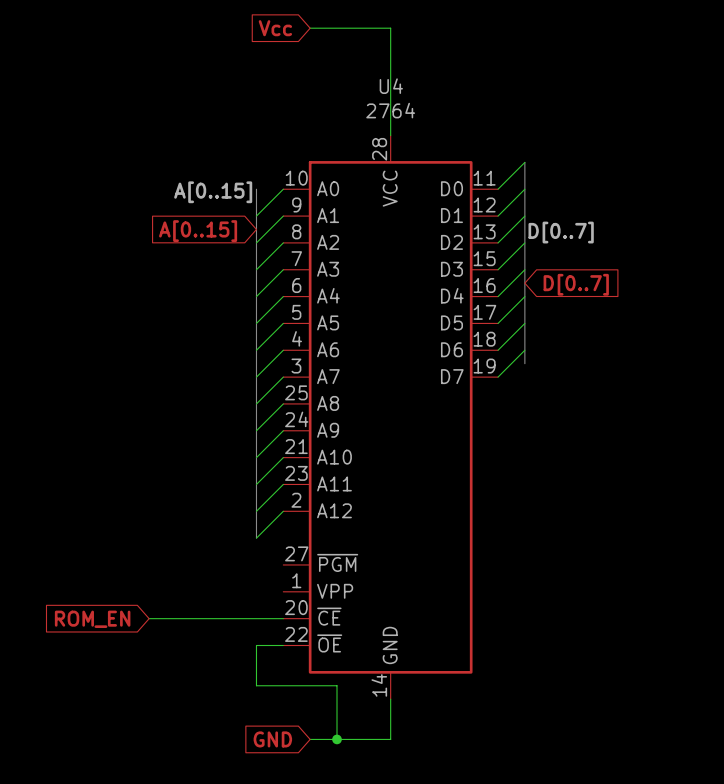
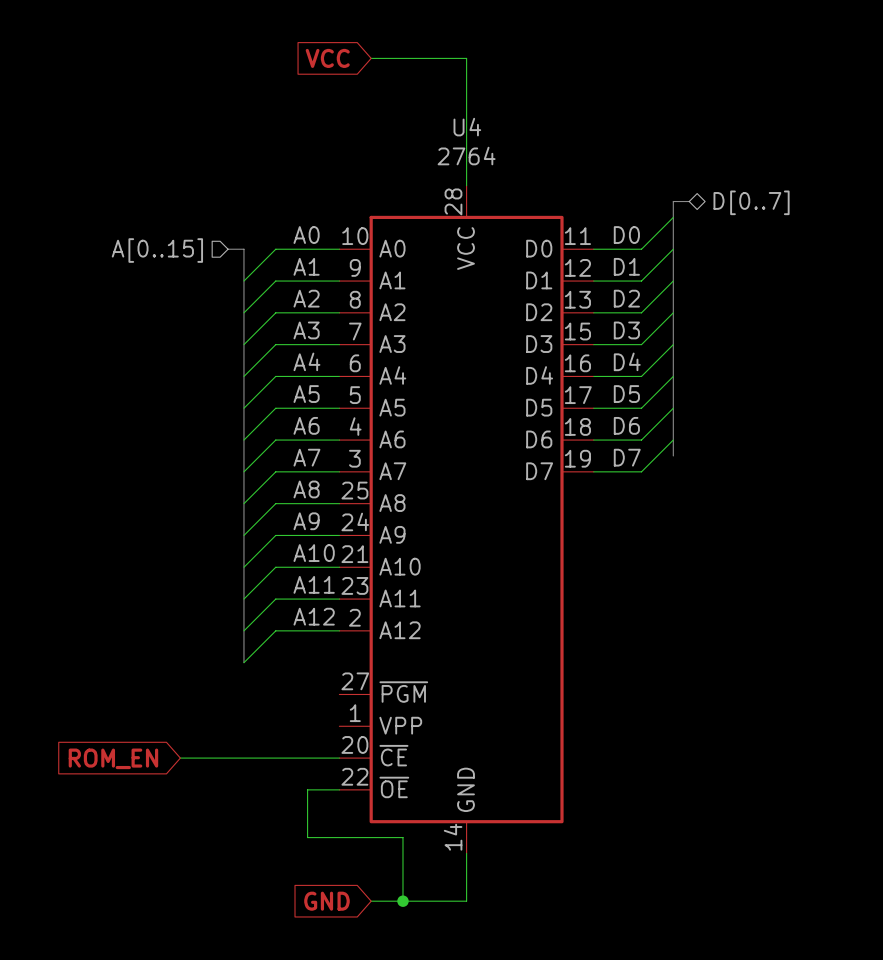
global label: Vcc (275, 28) -> VCC (327, 58)
bus: none -> (689, 201) (673, 201) (673, 455)
hierarchical label: none -> D[0..7] (751, 202)
wire: (524, 162) (498, 189) -> (673, 217) (641, 249) (593, 249)
bus: (524, 162) (524, 363) -> none
label: none -> A0 (306, 235)
label: none -> D0 (626, 235)
bus: none -> (228, 249) (243, 249) (243, 662)
bus: (256, 189) (256, 538) -> none
wire: (283, 189) (256, 216) -> (339, 249) (275, 249) (243, 281)
wire: (524, 189) (498, 216) -> (673, 249) (641, 281) (593, 281)
hierarchical label: none -> A[0..15] (157, 250)
label: A[0..15] (213, 192) -> none
label: none -> A1 (306, 266)
label: none -> D1 (626, 266)
wire: (283, 216) (256, 242) -> (339, 281) (275, 281) (243, 312)
wire: (524, 216) (498, 242) -> (673, 281) (641, 312) (593, 312)
label: none -> A2 (306, 298)
label: none -> D2 (626, 298)
global label: A[0..15] (198, 231) -> none
label: D[0..7] (561, 232) -> none
wire: (283, 242) (256, 269) -> (339, 312) (275, 312) (243, 344)
wire: (524, 242) (498, 269) -> (673, 312) (641, 344) (593, 344)
label: none -> A3 (306, 330)
label: none -> D3 (626, 330)
wire: (283, 269) (256, 296) -> (339, 344) (275, 344) (243, 376)
wire: (524, 269) (498, 296) -> (673, 344) (641, 376) (593, 376)
label: none -> A4 (306, 361)
label: none -> D4 (627, 361)
global label: D[0..7] (576, 284) -> none
wire: (283, 296) (256, 323) -> (339, 376) (275, 376) (243, 408)
wire: (524, 296) (498, 323) -> (673, 376) (641, 408) (593, 408)
label: none -> A5 (306, 394)
label: none -> D5 (626, 394)
wire: (283, 323) (256, 350) -> (339, 408) (275, 408) (243, 440)
wire: (524, 323) (498, 350) -> (673, 408) (641, 440) (593, 440)
label: none -> A6 (306, 425)
label: none -> D6 (626, 425)
wire: (283, 350) (256, 377) -> (339, 440) (275, 440) (243, 471)
wire: (524, 350) (498, 377) -> (673, 440) (641, 471) (593, 471)
label: none -> A7 (306, 457)
label: none -> D7 (627, 457)
wire: (283, 377) (256, 403) -> (339, 471) (275, 471) (243, 503)
label: none -> A8 (306, 489)
wire: (283, 403) (256, 430) -> (339, 503) (275, 503) (243, 535)
label: none -> A9 (306, 521)
wire: (283, 430) (256, 457) -> (339, 535) (275, 535) (243, 567)
label: none -> A10 (314, 553)
wire: (283, 457) (256, 484) -> (339, 567) (275, 567) (243, 599)
label: none -> A11 (314, 584)
wire: (283, 484) (256, 511) -> (339, 599) (275, 599) (243, 630)
label: none -> A12 (314, 616)
wire: (283, 511) (256, 538) -> (339, 630) (275, 630) (243, 662)

